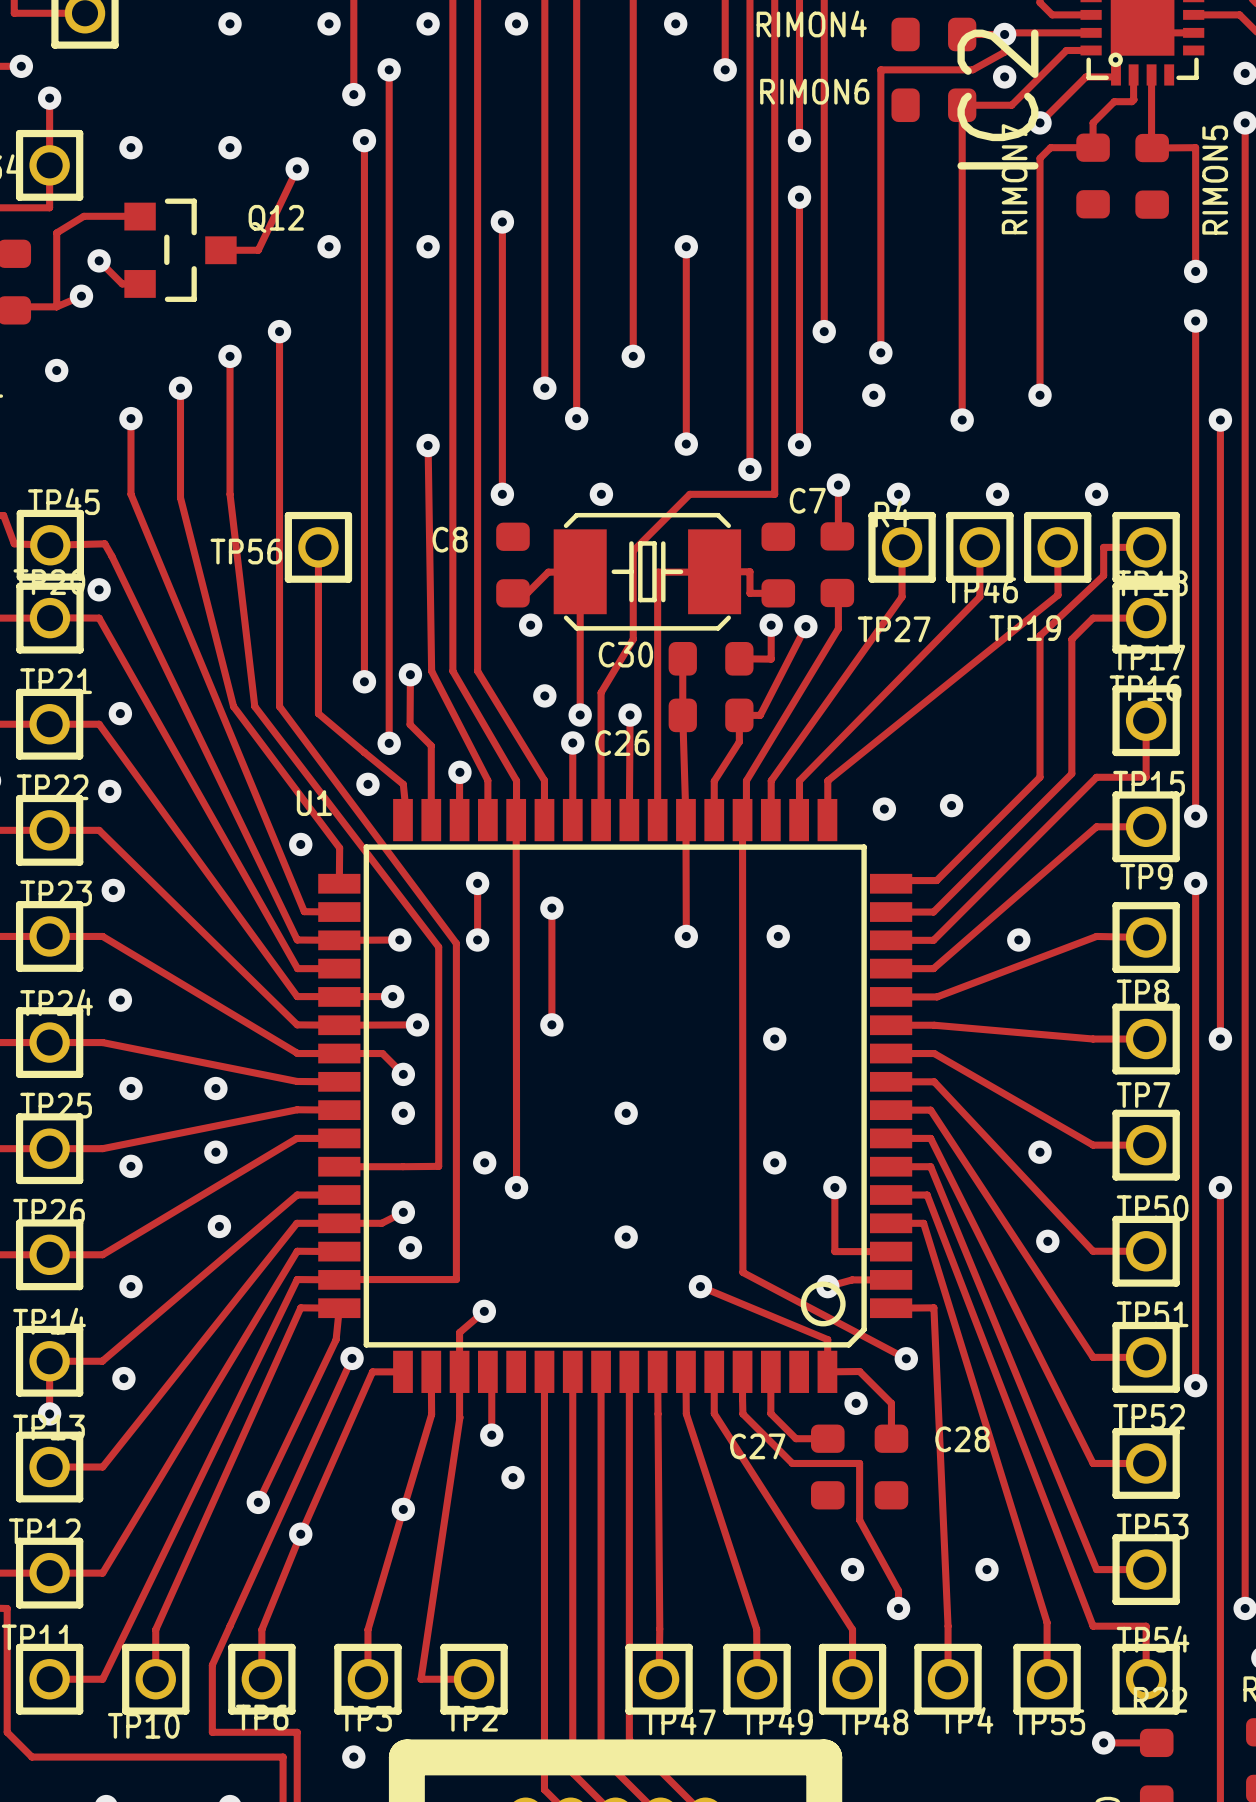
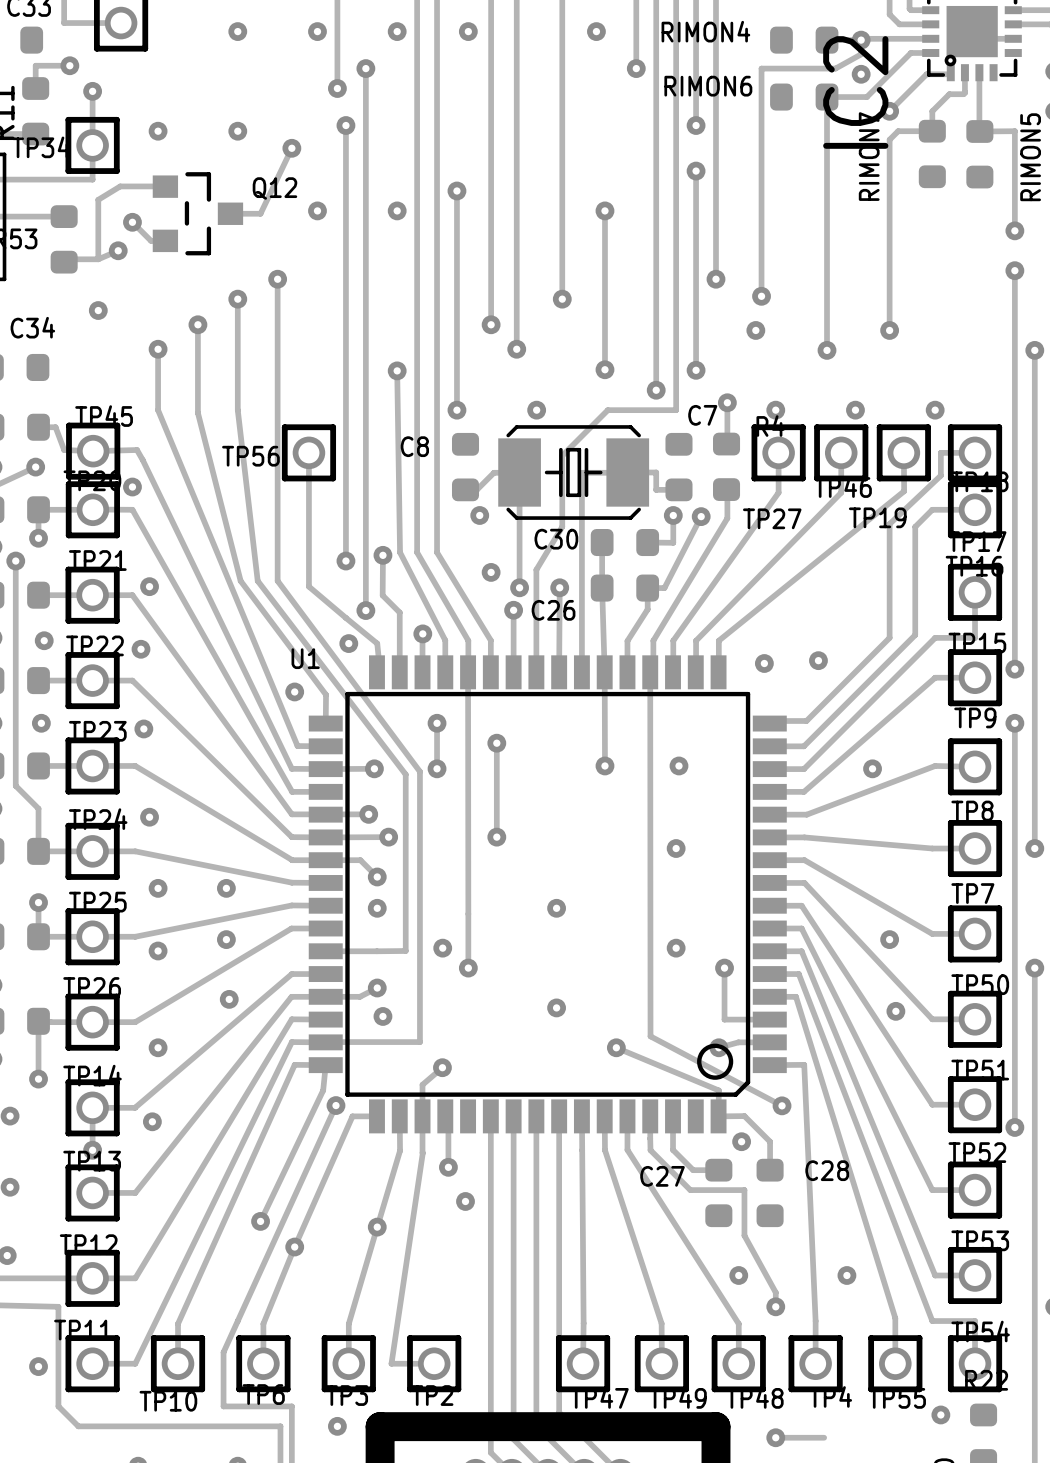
track: (1103, 1742) (1156, 1742) -> none
track: none -> (775, 1437) (824, 1437)
via: none -> (775, 1437)

